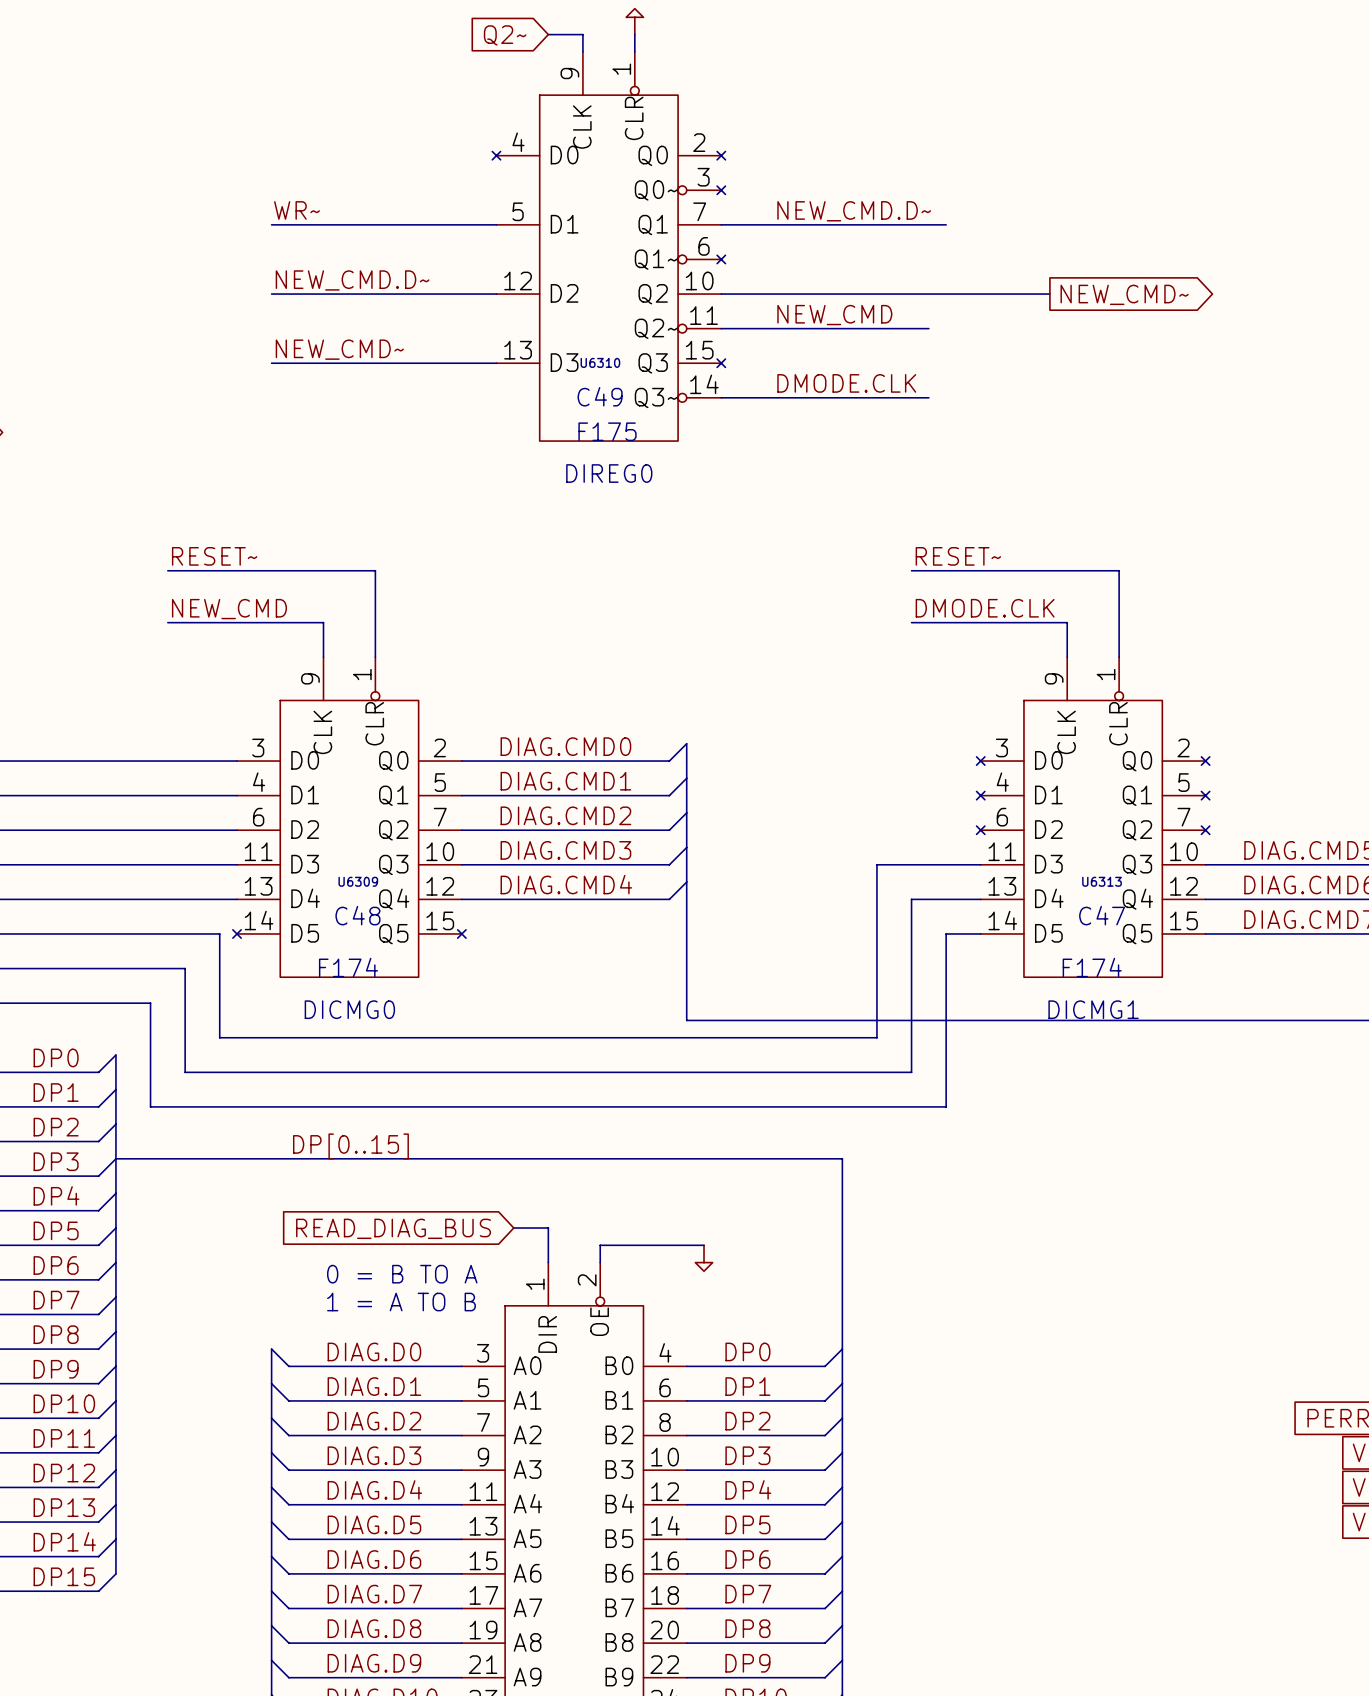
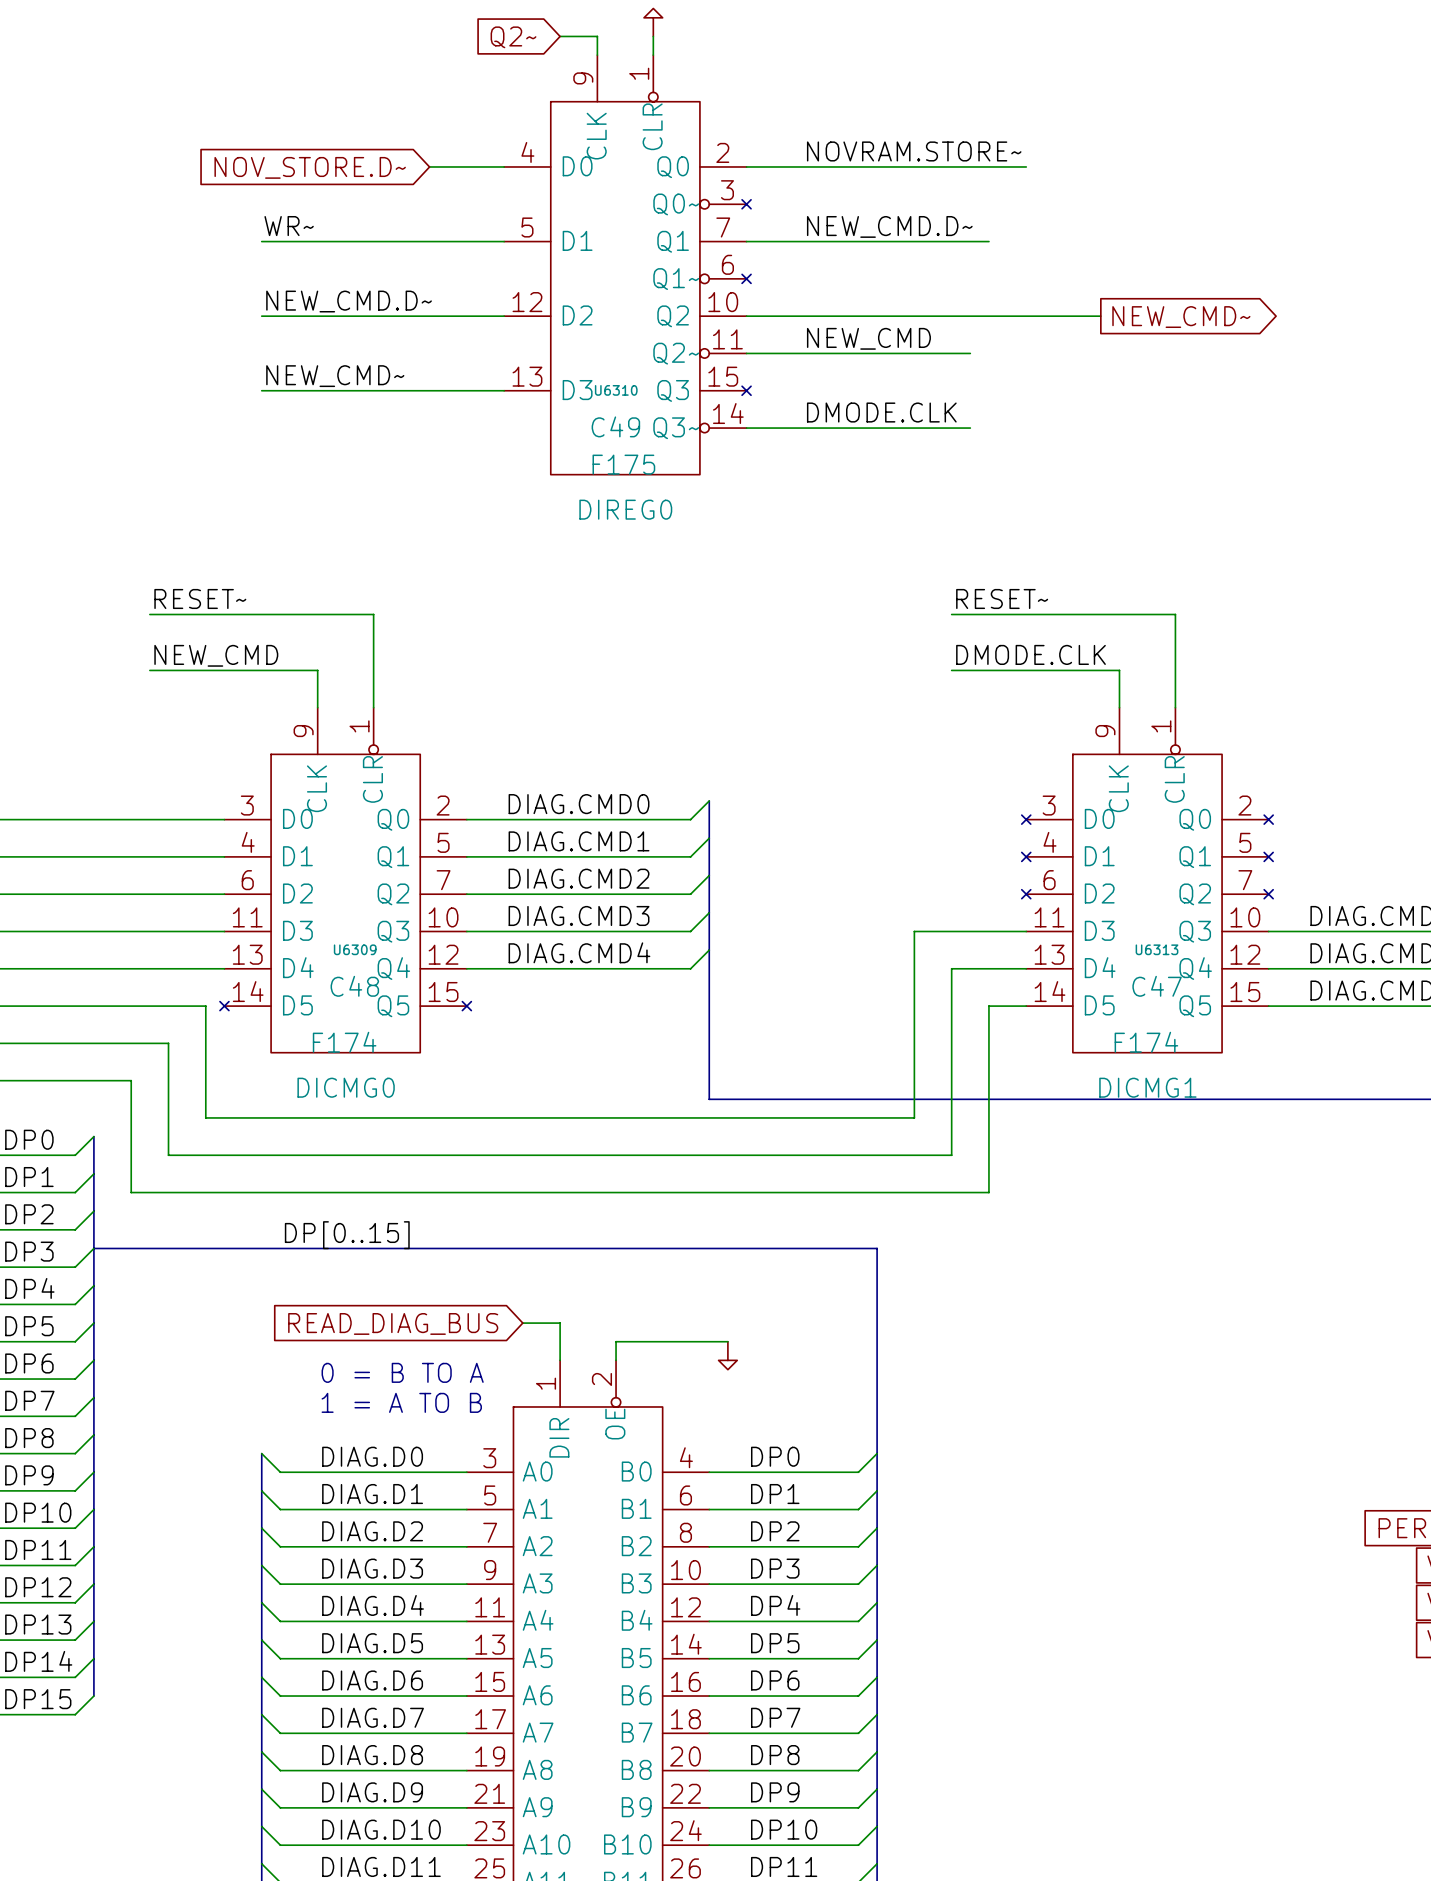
label: none -> NOVRAM.STORE~ (914, 151)
wire: none -> (429, 166) (504, 166)
no-connect mark: (496, 155) -> none
wire: none -> (746, 166) (1026, 166)
no-connect mark: (721, 155) -> none
global label: none -> NOV_STORE.D~ (310, 167)

